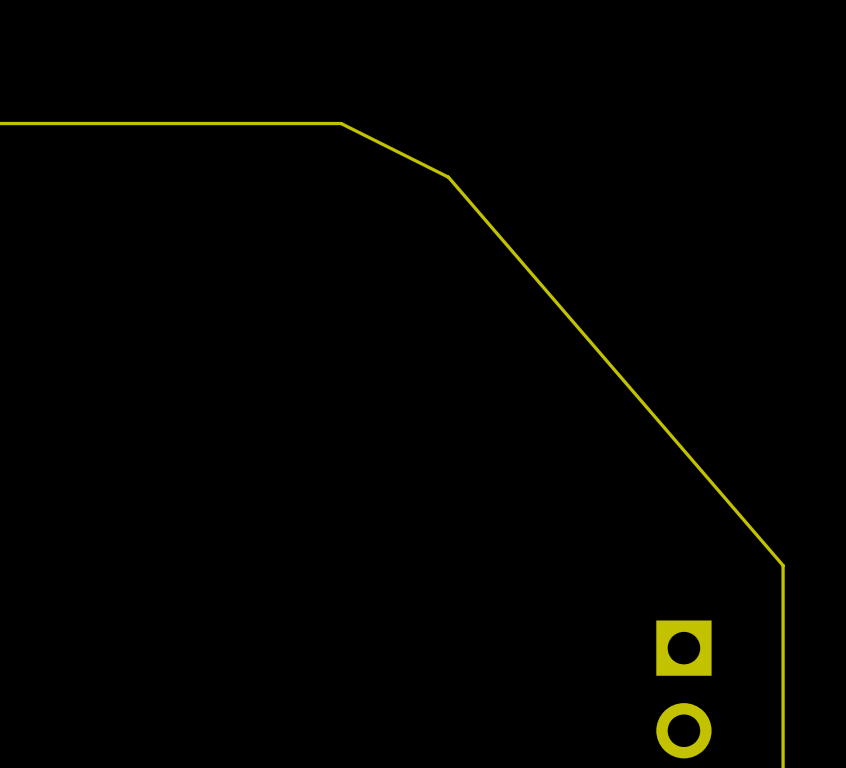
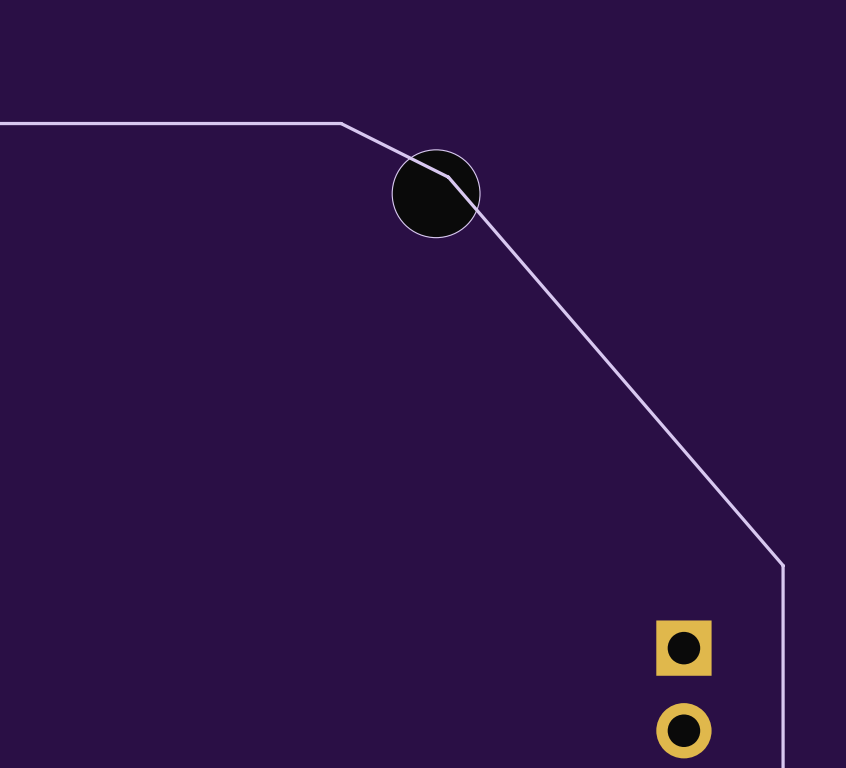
part: none -> (436, 193)

